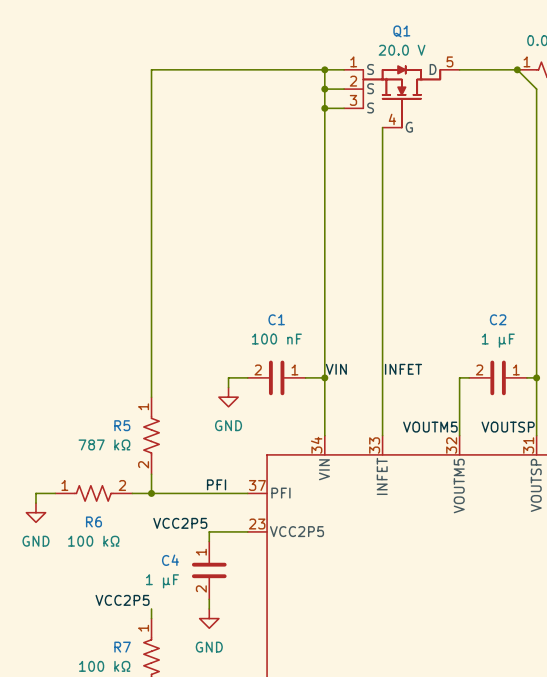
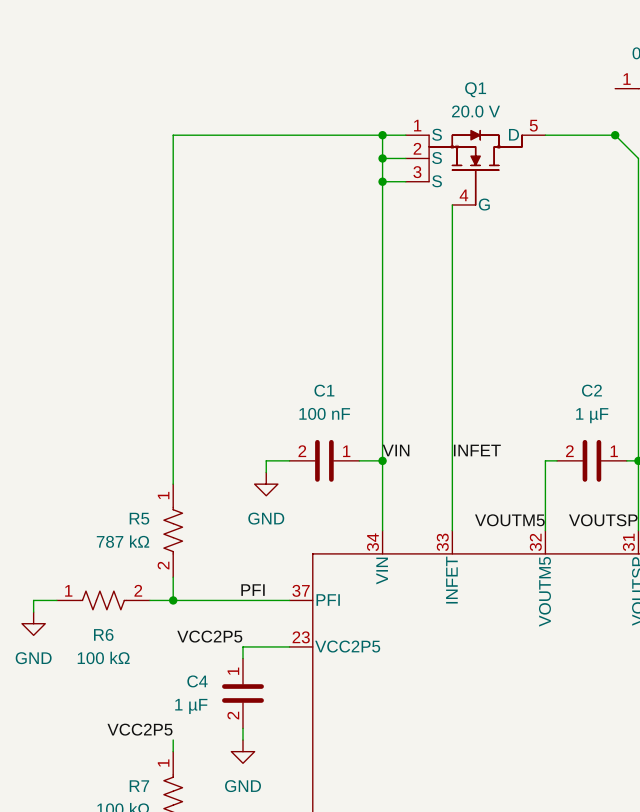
wire: (324, 69) (324, 108) -> none
junction: (324, 69) -> none
wire: (344, 69) (151, 69) (151, 108) -> (382, 135) (173, 135)
wire: (459, 69) (517, 69) (536, 89) (536, 127) -> (545, 135) (615, 135) (638, 158)
junction position: (517, 69) -> (615, 135)
wire: (324, 89) (344, 89) -> (382, 158) (405, 158)
junction: (324, 89) -> none
Q1 position: (401, 96) -> (475, 167)
junction: none -> (382, 158)
wire: (382, 127) (382, 166) -> none
wire: none -> (382, 181) (405, 181)
junction: none -> (382, 181)

